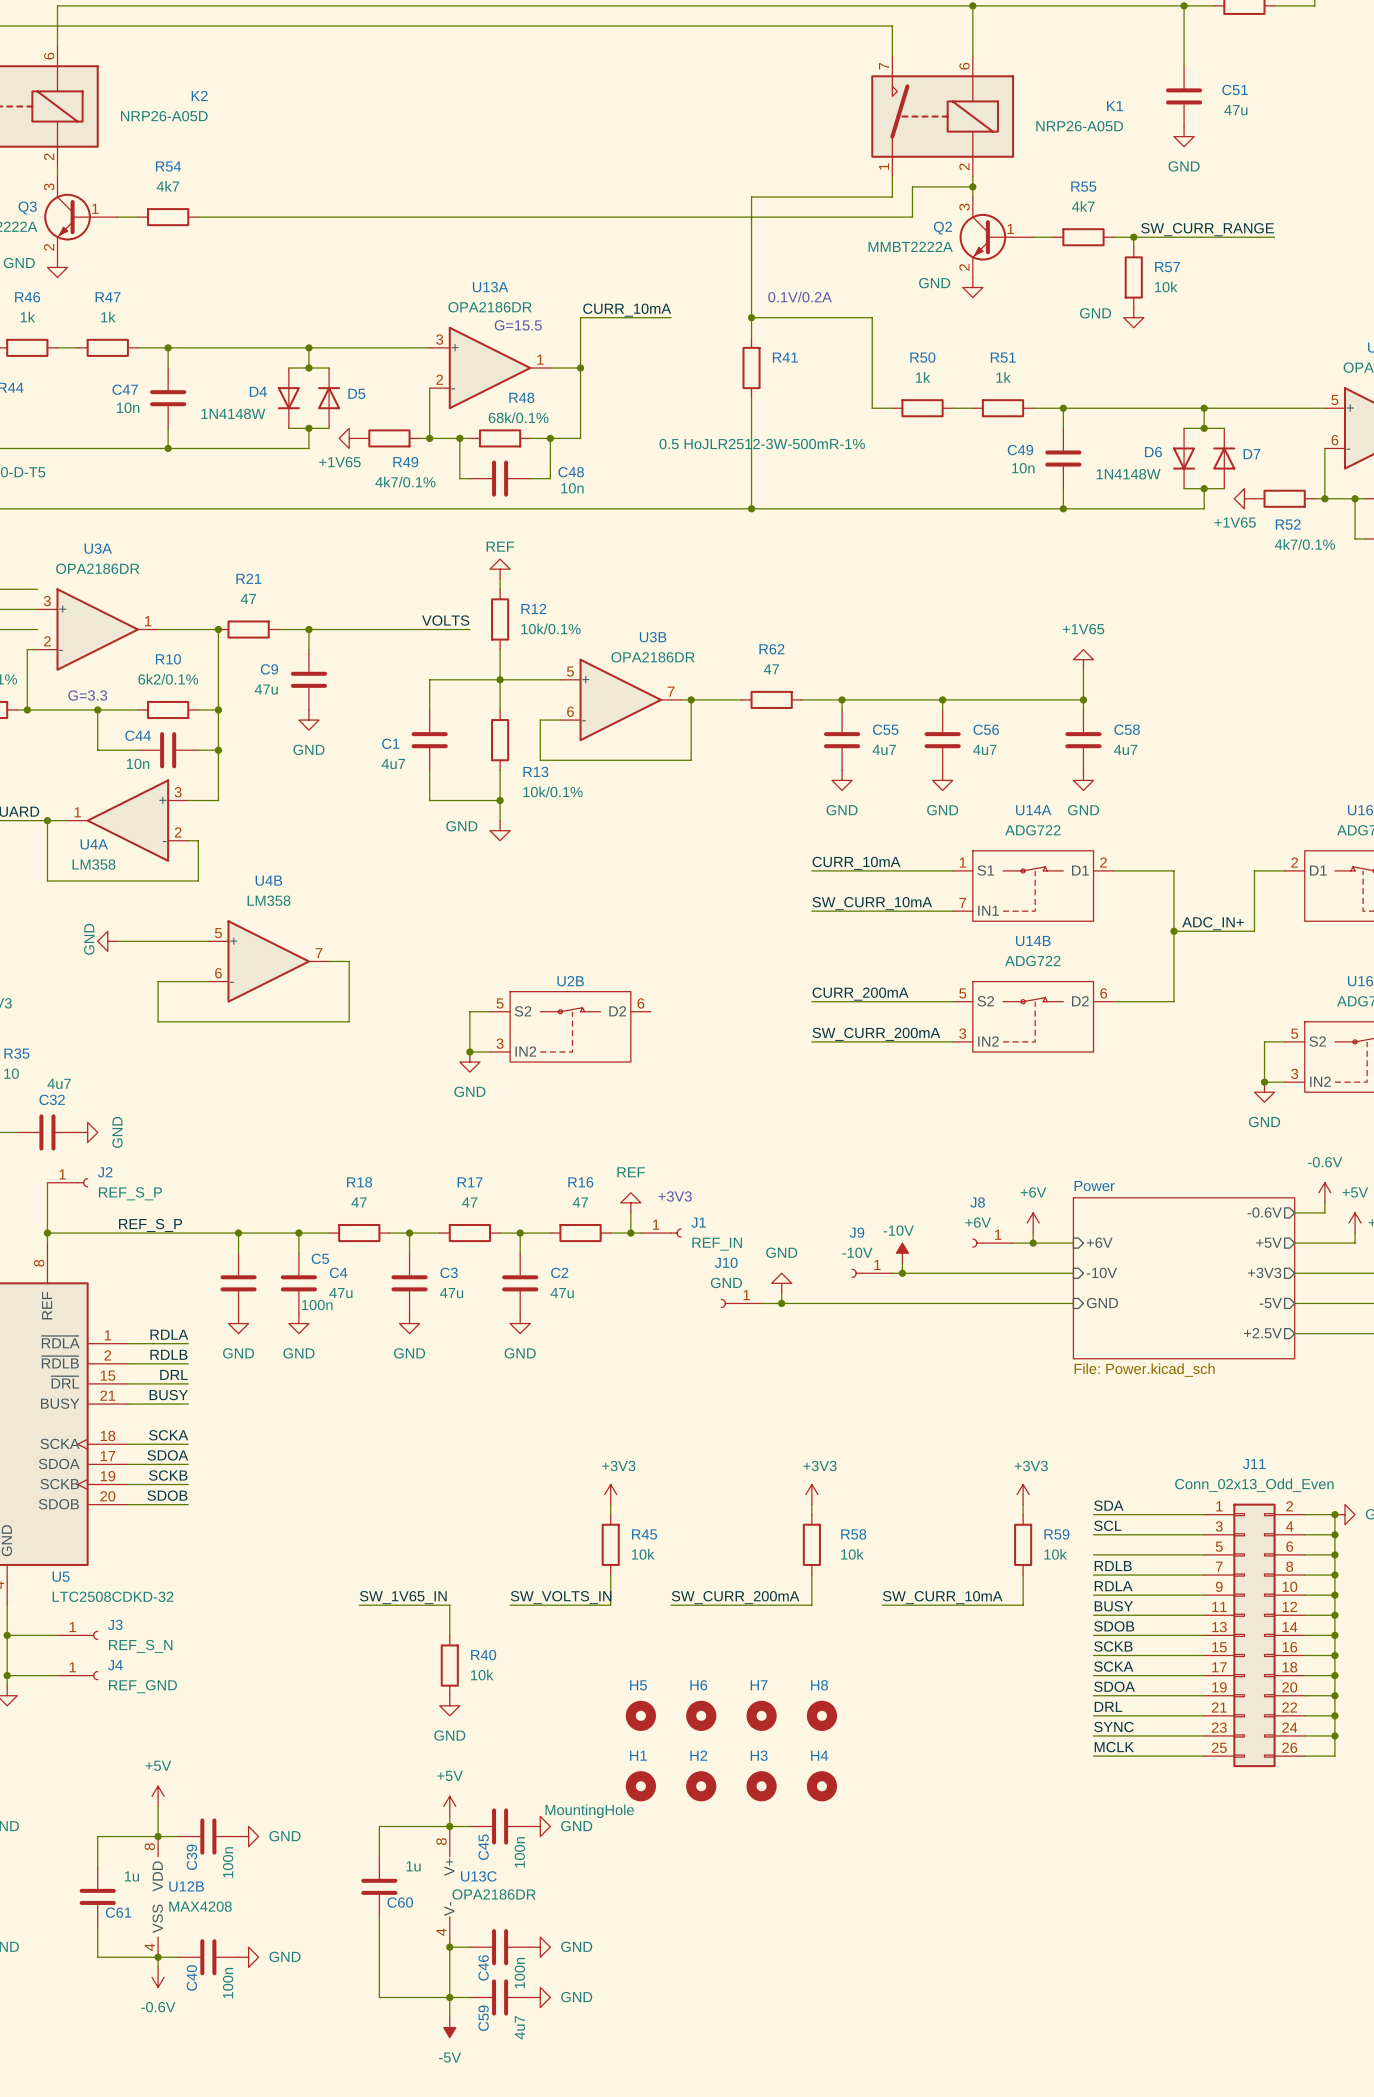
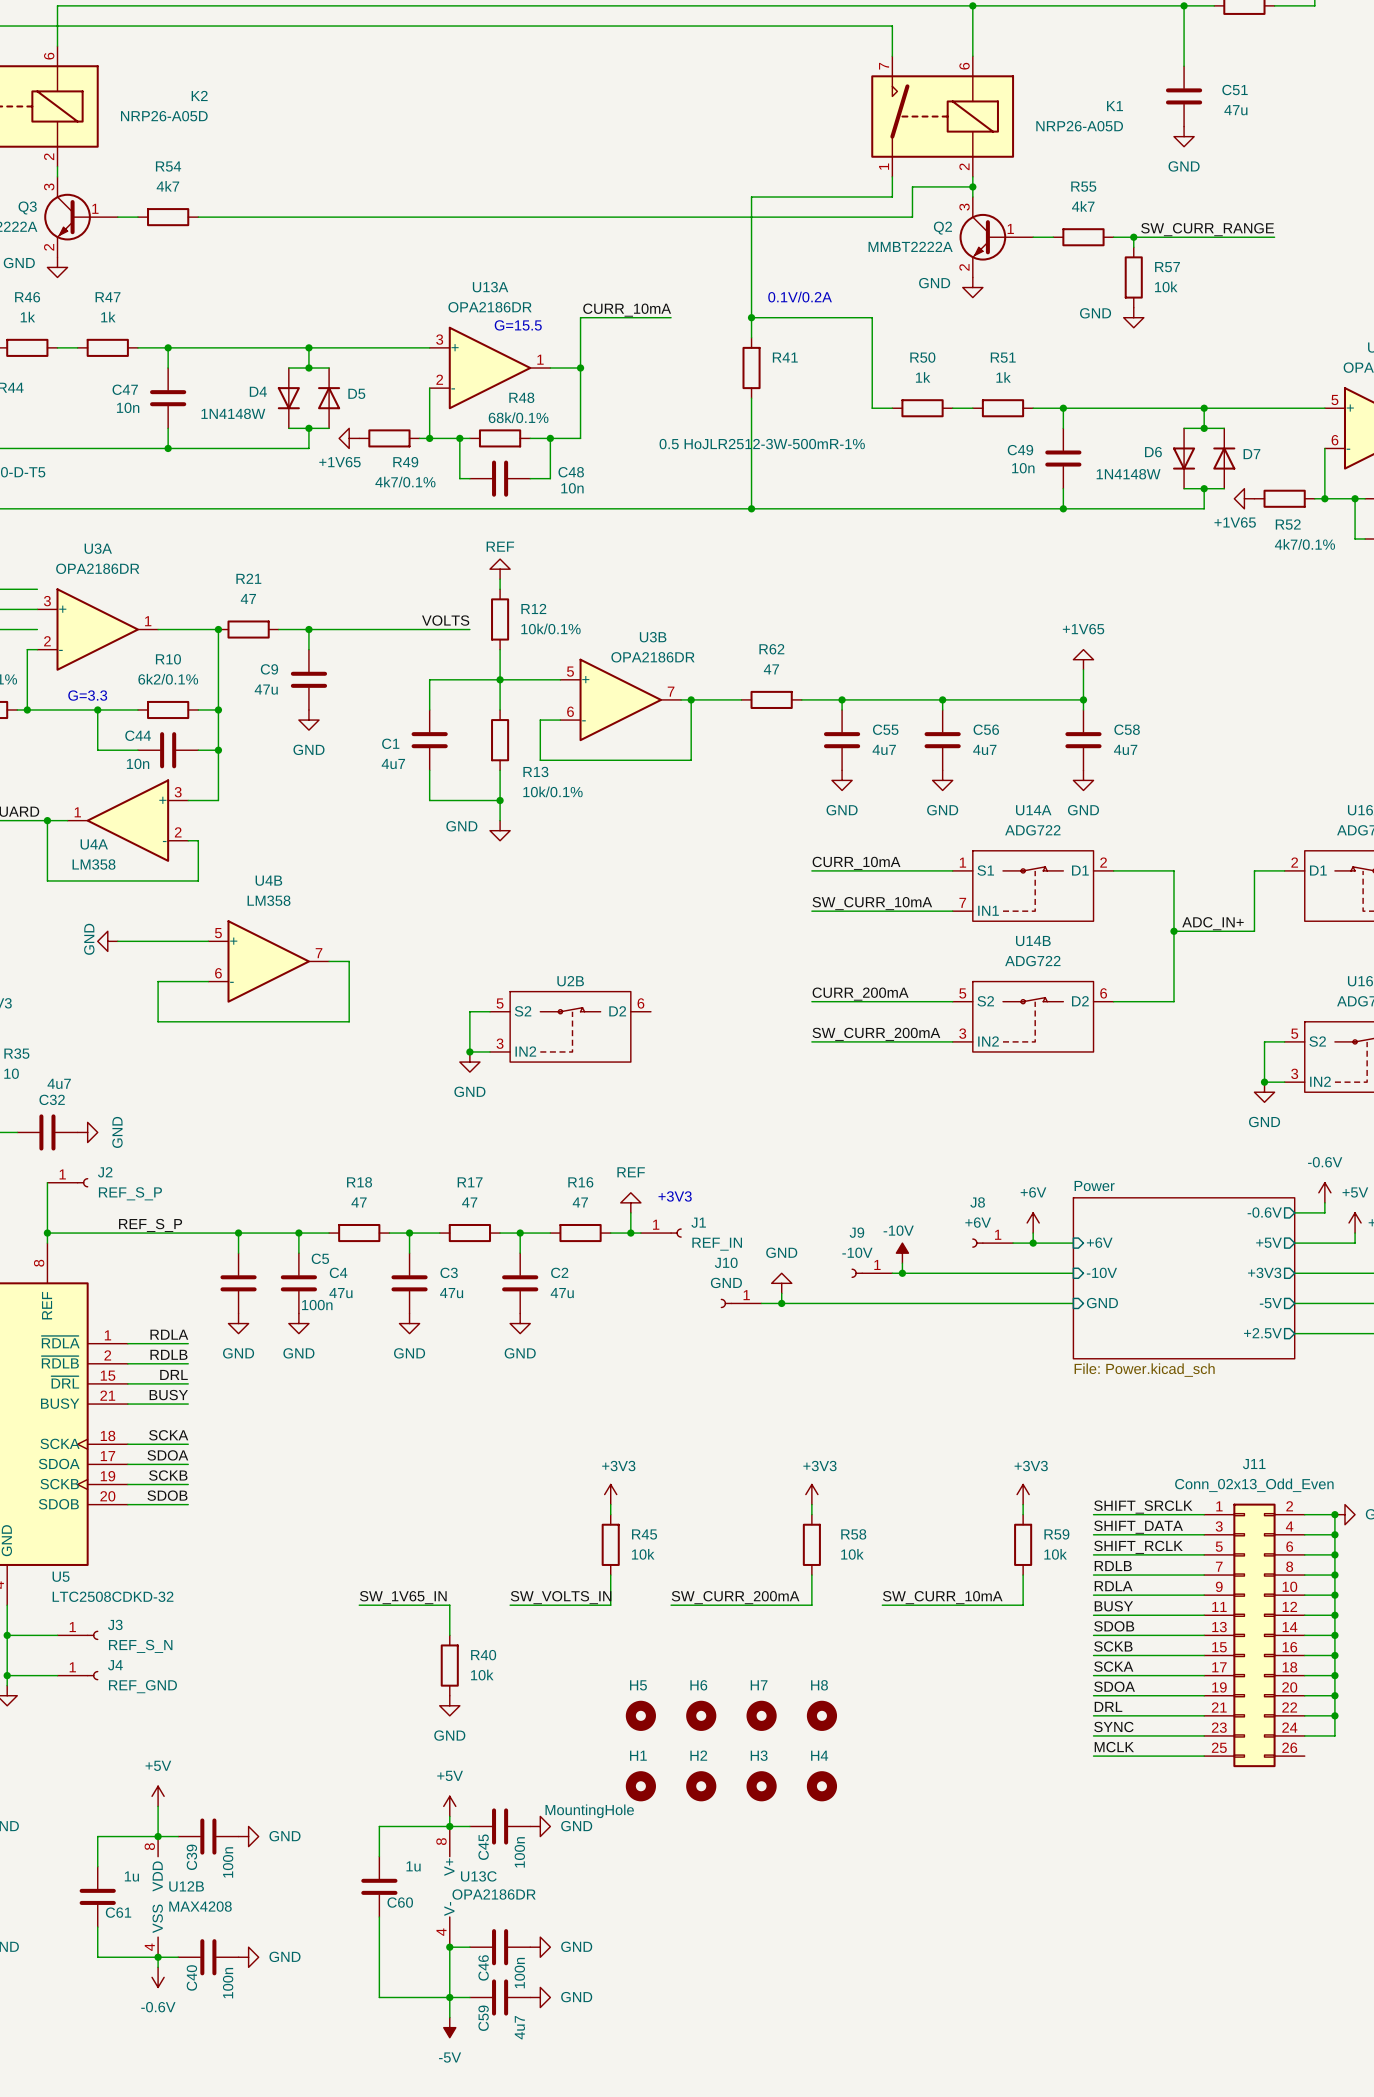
label: SDA (1108, 1505) -> SHIFT_SRCLK (1143, 1507)
label: SCL (1107, 1525) -> SHIFT_DATA (1138, 1527)
label: none -> SHIFT_RCLK (1138, 1547)
wire: (1334, 1735) (1334, 1756) (1304, 1756) -> none
junction: (1334, 1735) -> none

